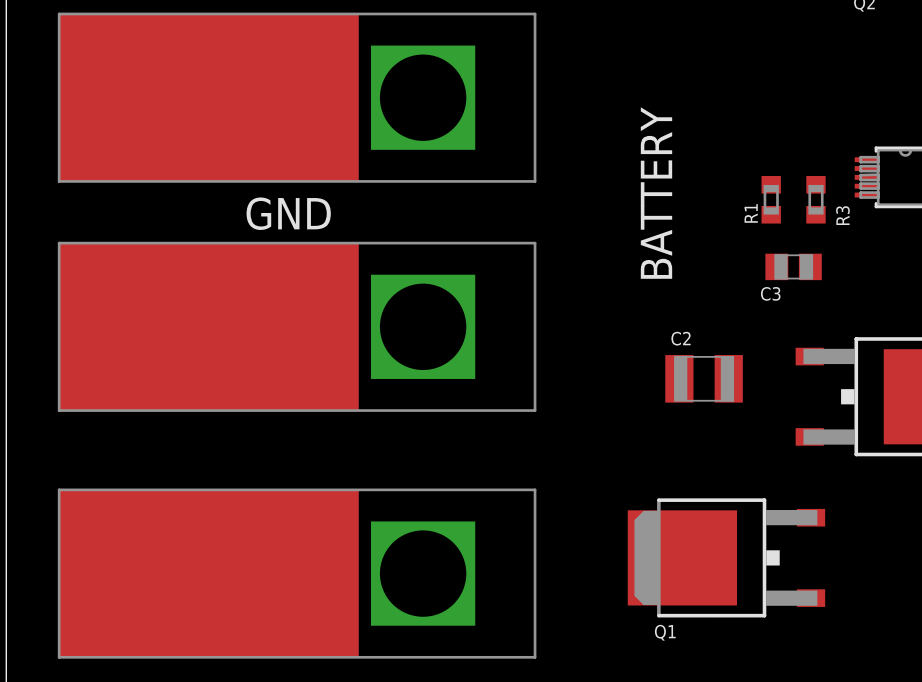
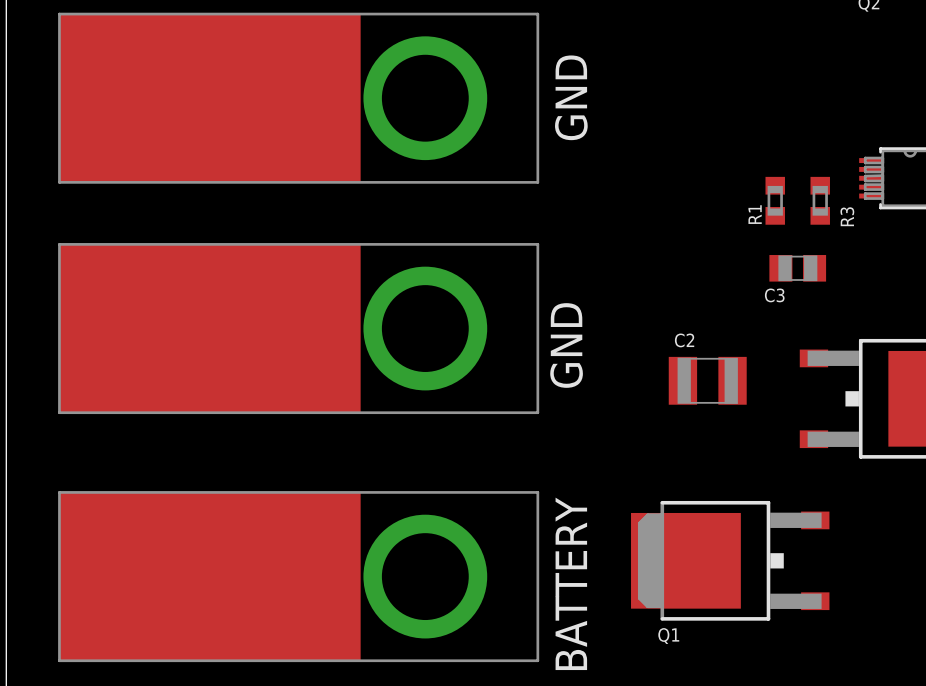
part footprint: [57, 12, 537, 183] -> [58, 12, 540, 184]
text: none -> GND (571, 97)
text position: BATTERY (656, 193) -> BATTERY (571, 583)
text: GND (288, 213) -> none
part footprint: [57, 241, 537, 412] -> [58, 243, 540, 415]
text: none -> GND (566, 345)
part footprint: [57, 488, 537, 659] -> [58, 491, 540, 663]

